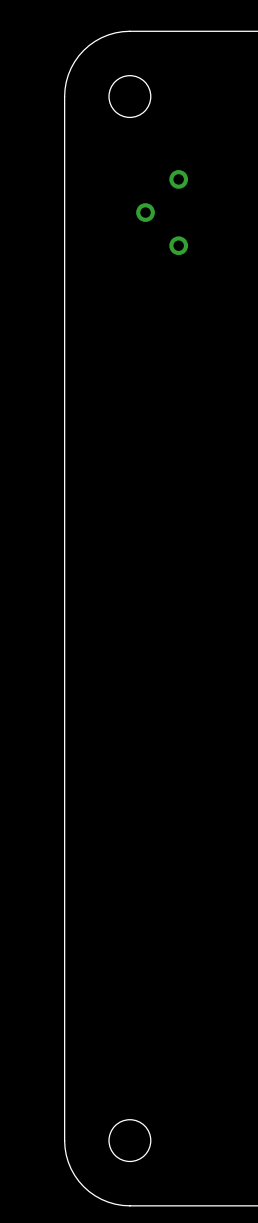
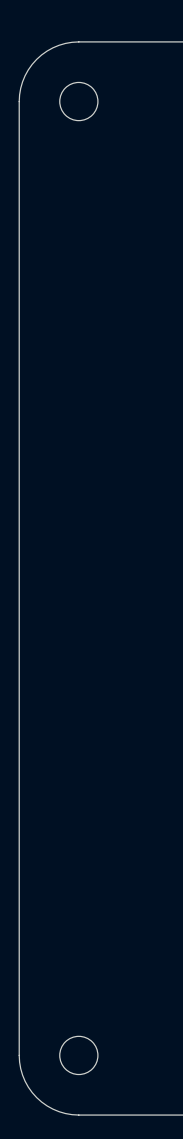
part: (162, 212) -> none

